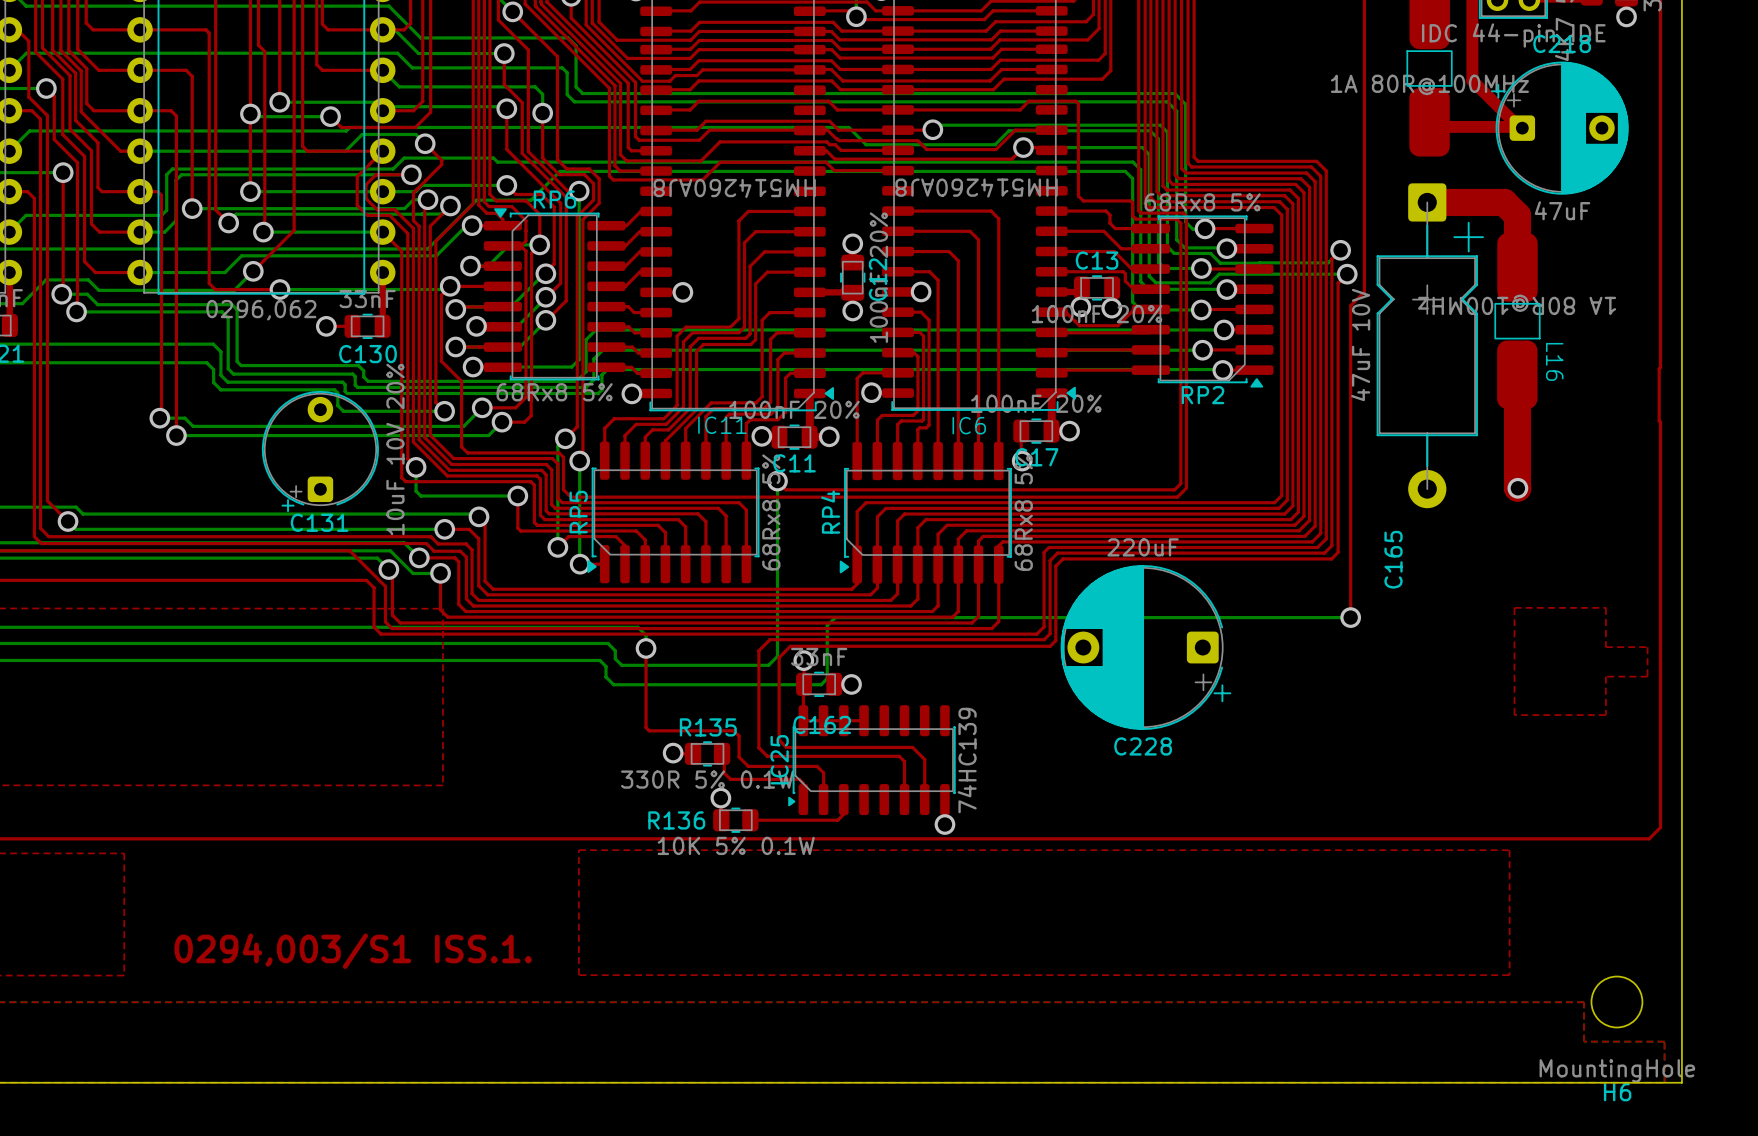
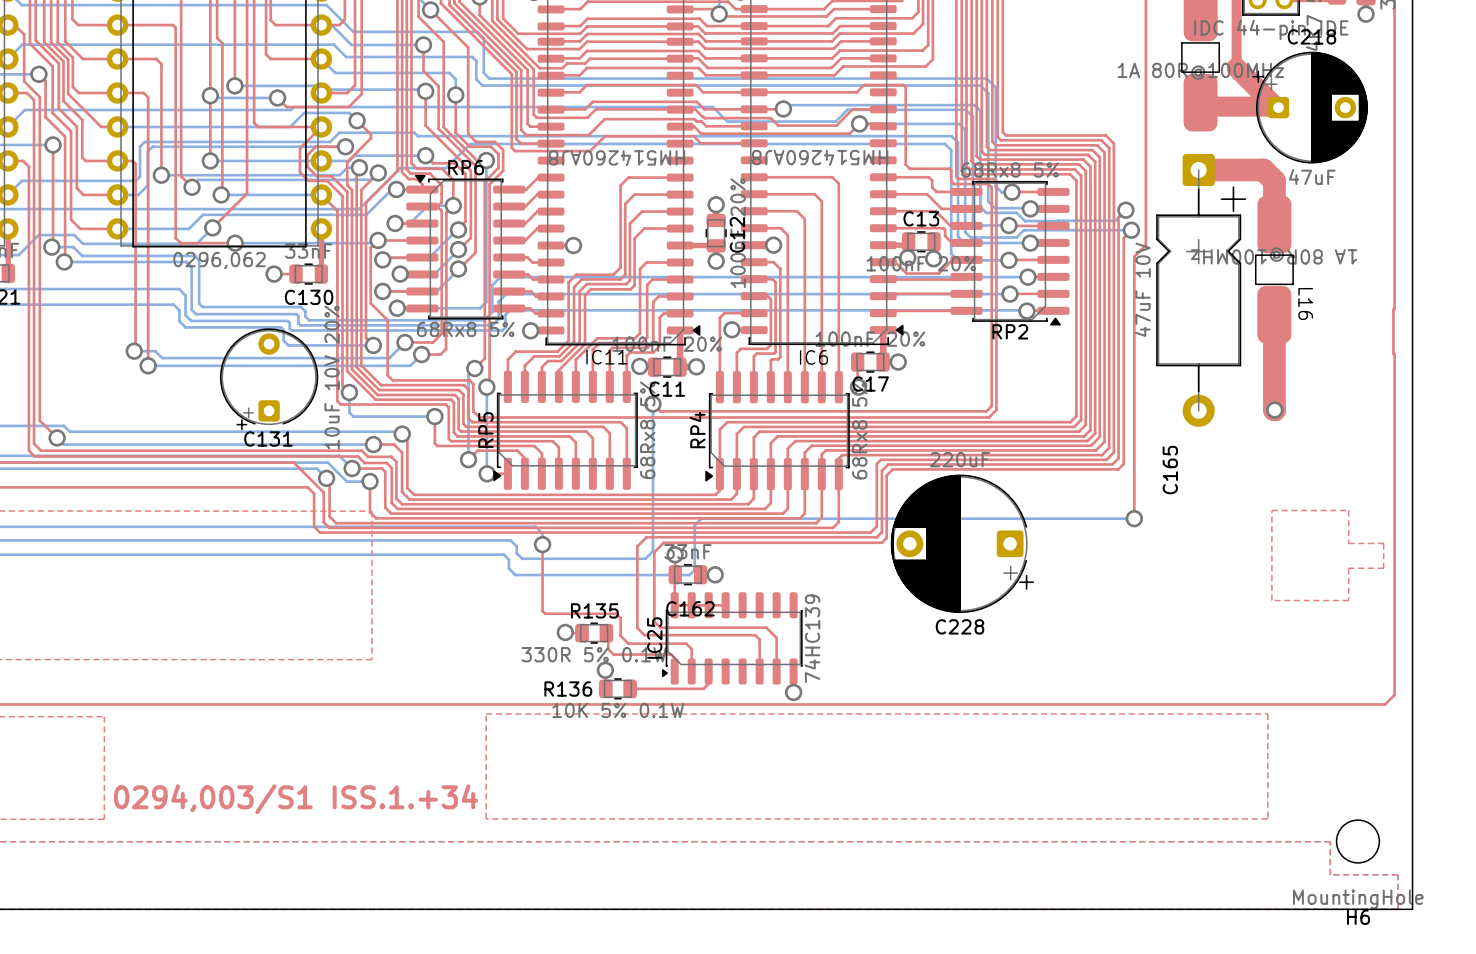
top track width: thin (1472, 80) (1518, 126) (1429, 126) -> thick (1236, 67) (1275, 106) (1200, 106)
text: 0294,003/S1 ISS.1. (353, 951) -> 0294,003/S1 ISS.1.+34 (295, 799)

